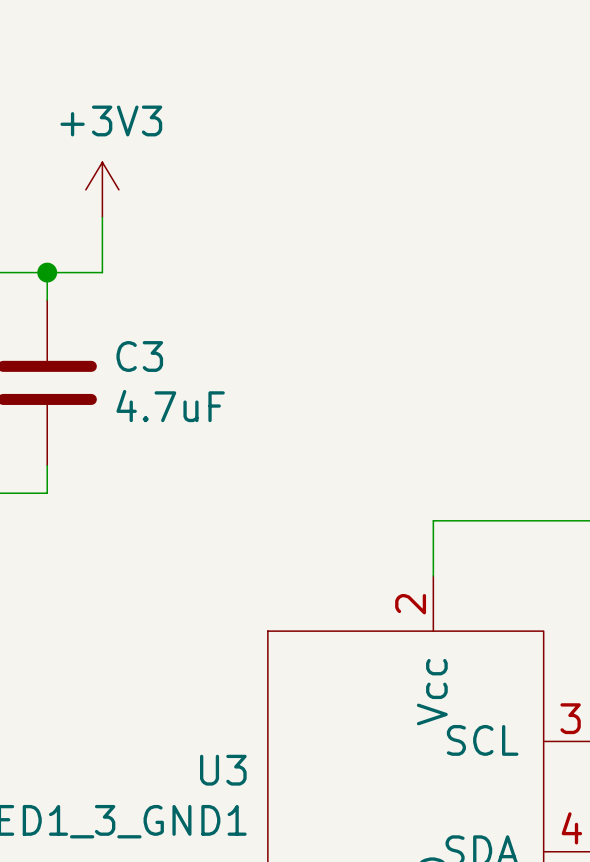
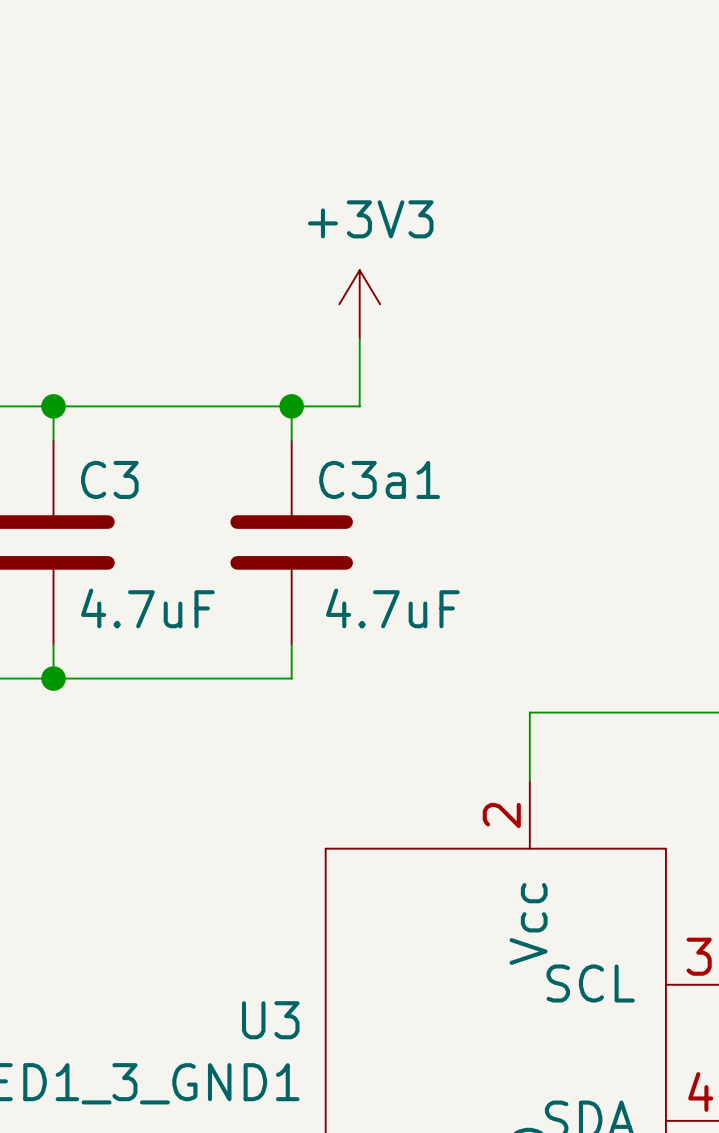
power symbol position: +3V3 (102, 189) -> +3V3 (359, 304)
wire: (102, 217) (102, 272) -> (359, 338) (359, 406) (121, 406)
wire: none -> (291, 406) (291, 440)
junction: none -> (291, 406)
C3 name position: C3 (139, 356) -> C3 (109, 479)
C3a1: none -> 4.7uF (291, 542)
C3 value position: 4.7uF (170, 406) -> 4.7uF (147, 608)
wire: none -> (291, 644) (291, 678) (53, 678)
junction: none -> (53, 678)

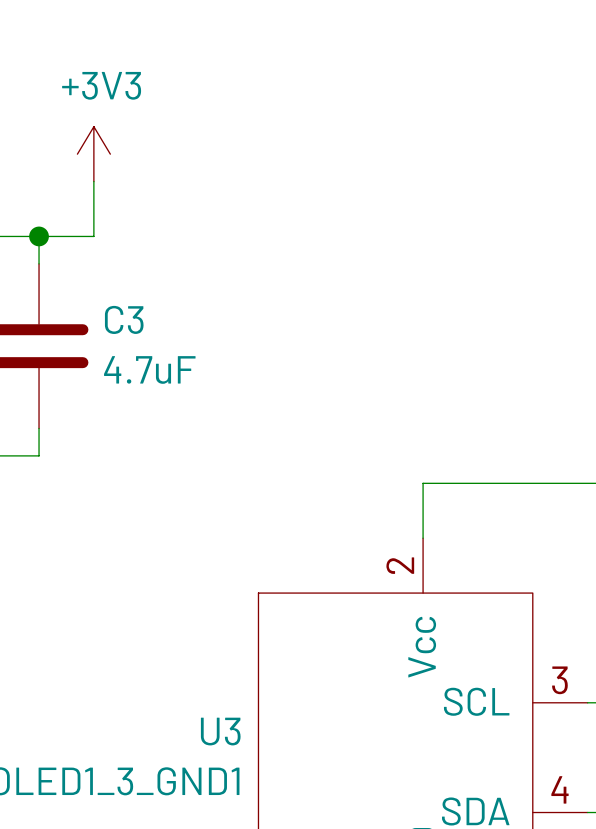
power symbol position: +3V3 (359, 304) -> +3V3 (93, 154)
wire: (359, 338) (359, 406) (121, 406) -> (93, 181) (93, 236)
wire: (291, 406) (291, 440) -> none
junction: (291, 406) -> none
C3 name position: C3 (109, 479) -> C3 (124, 319)
C3a1: 4.7uF (291, 542) -> none
C3 value position: 4.7uF (147, 608) -> 4.7uF (149, 369)
wire: (291, 644) (291, 678) (53, 678) -> none
junction: (53, 678) -> none

